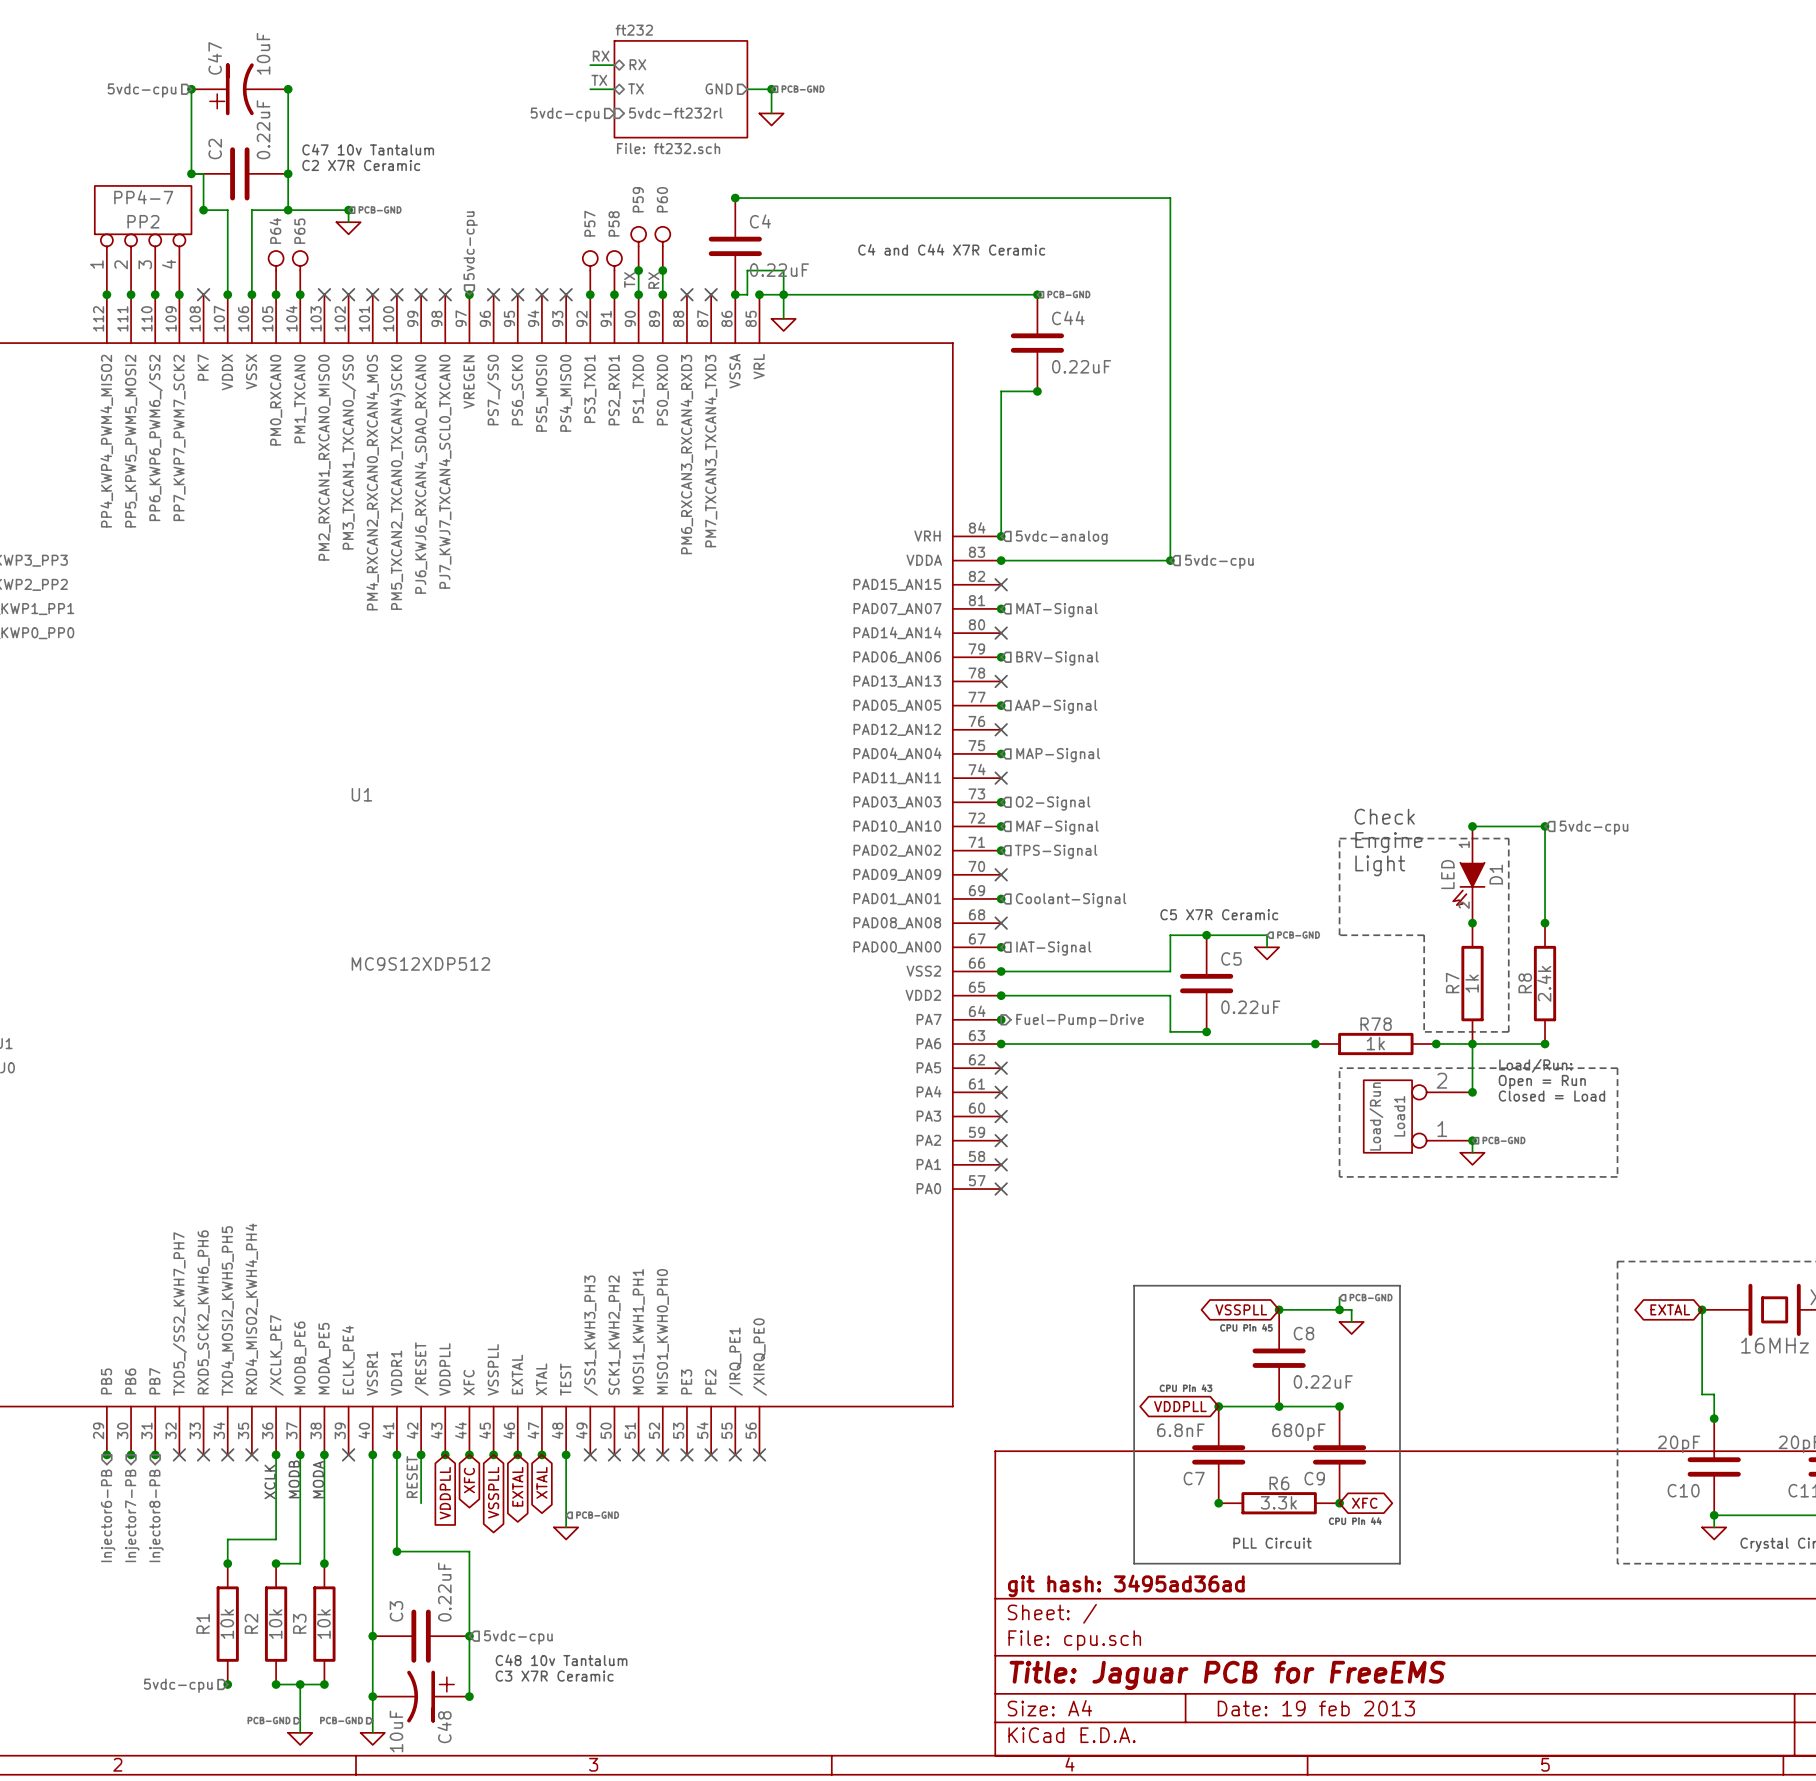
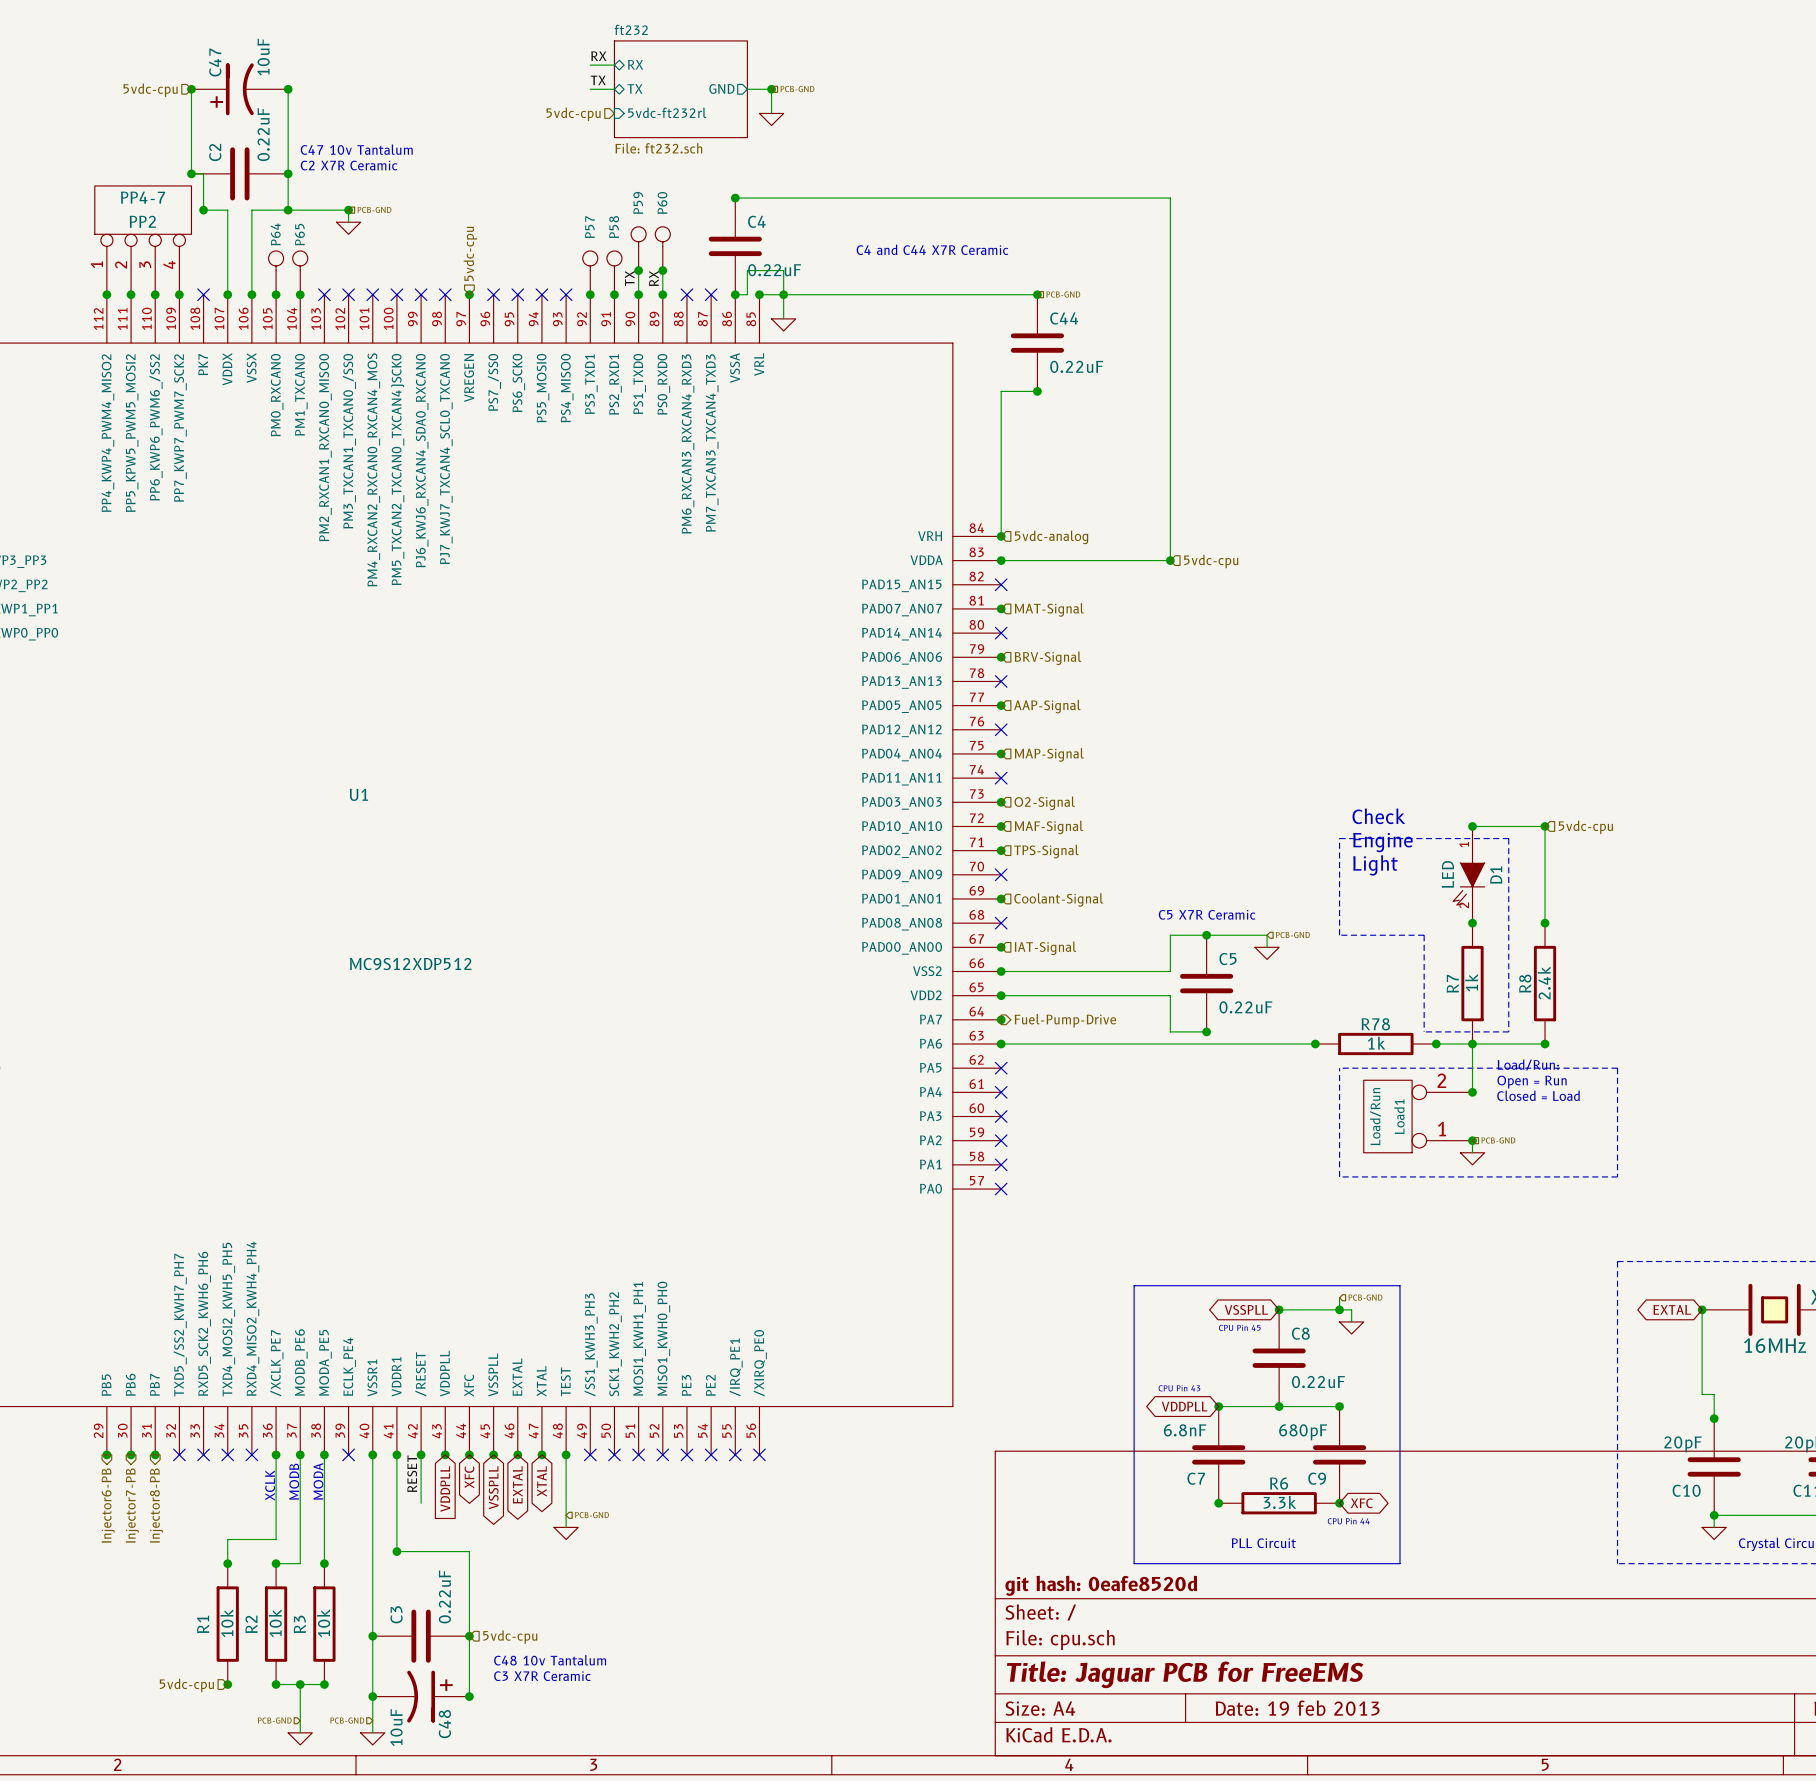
title block: git hash: 3495ad36ad (1126, 1585) -> git hash: 0eafe8520d (1101, 1585)

